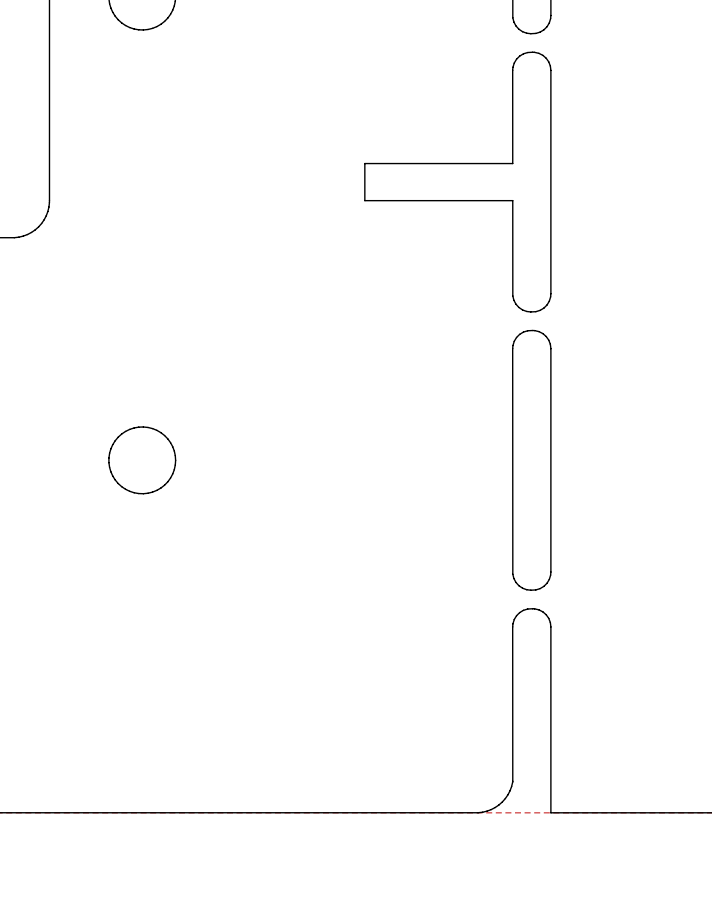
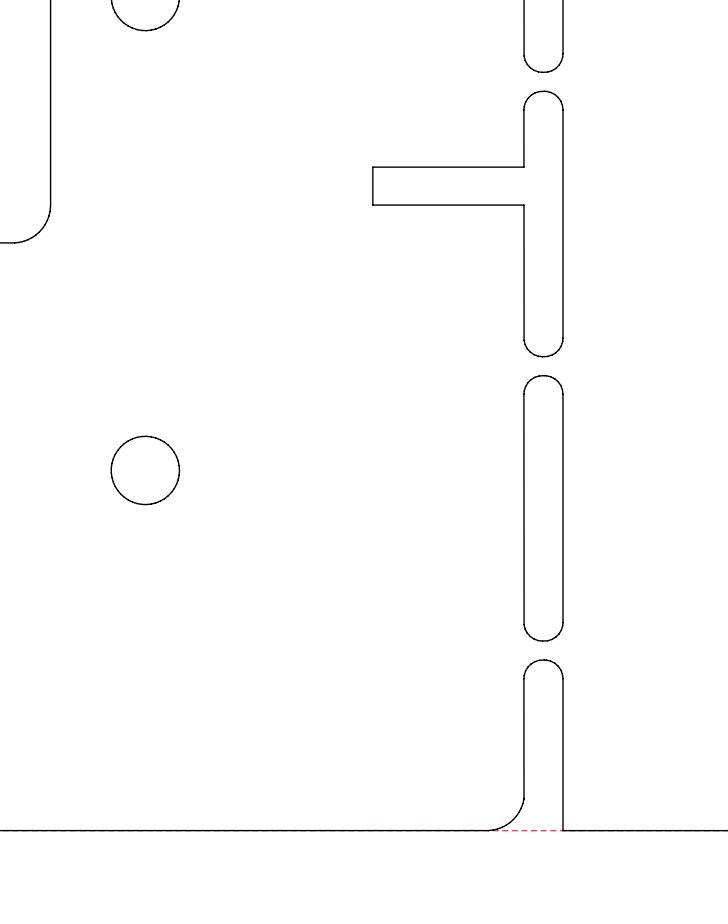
board edge: (550, 15) (547, 26) (535, 33) (526, 33) (518, 29) (512, 17) -> (562, 15) (562, 57) (559, 65) (547, 72) (534, 70) (525, 60) (524, 18)
board edge: (512, 107) (514, 63) (523, 53) (532, 52) (542, 55) (550, 66) (550, 107) -> (523, 109) (525, 102) (531, 95) (544, 91) (550, 92) (558, 97) (562, 109)
board edge: (550, 293) (547, 304) (535, 311) (526, 311) (518, 307) (512, 295) -> (562, 300) (562, 341) (559, 349) (547, 356) (534, 354) (525, 344) (524, 302)
board edge: (512, 385) (514, 341) (523, 332) (532, 330) (542, 333) (550, 344) (550, 385) -> (523, 394) (525, 386) (531, 379) (544, 375) (550, 376) (558, 381) (562, 394)
board edge: (550, 572) (547, 583) (535, 589) (526, 589) (518, 585) (512, 574) -> (562, 584) (562, 625) (559, 633) (547, 640) (534, 639) (525, 629) (524, 586)
board edge: (512, 664) (514, 619) (523, 610) (532, 608) (542, 611) (550, 622) (550, 664) -> (523, 678) (525, 671) (531, 663) (544, 660) (550, 661) (558, 666) (562, 678)

